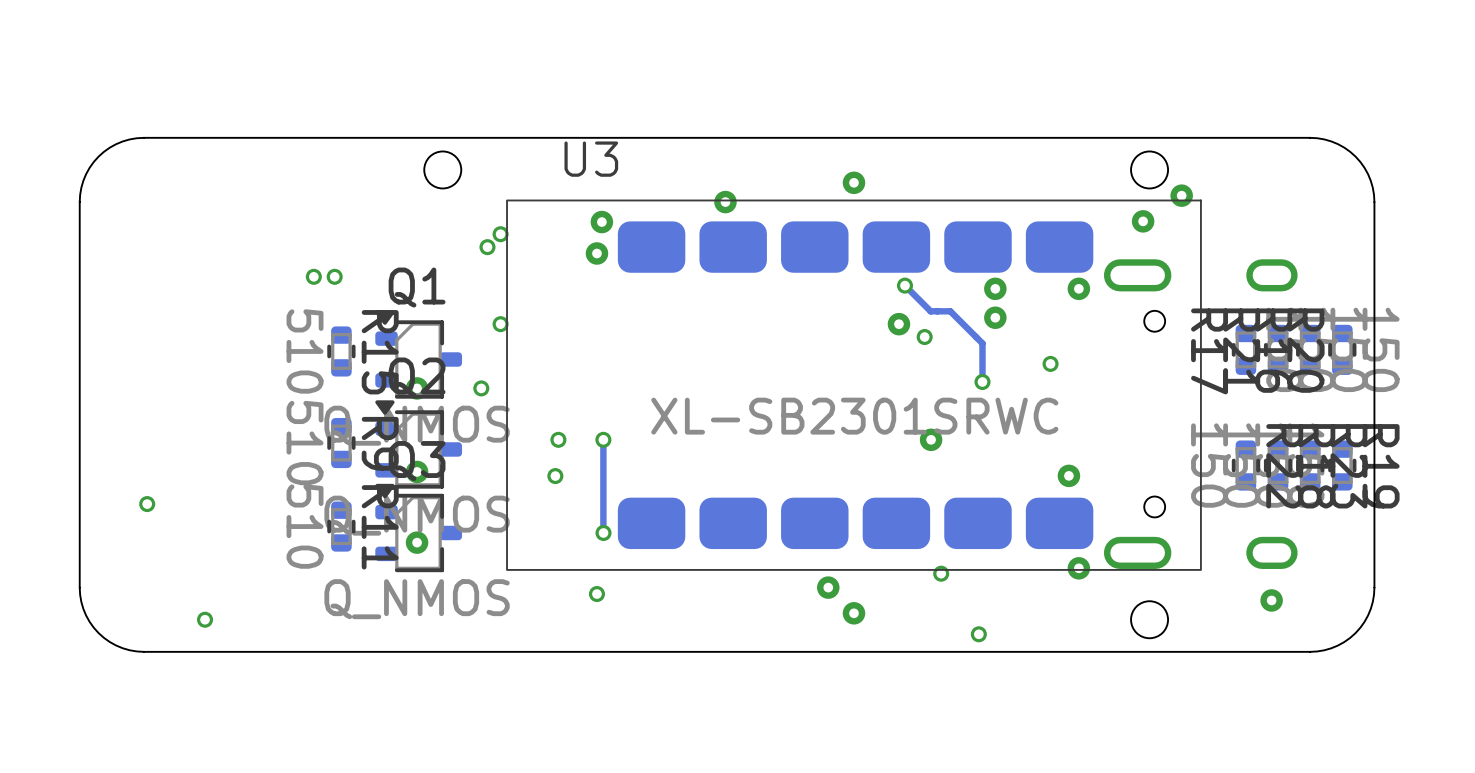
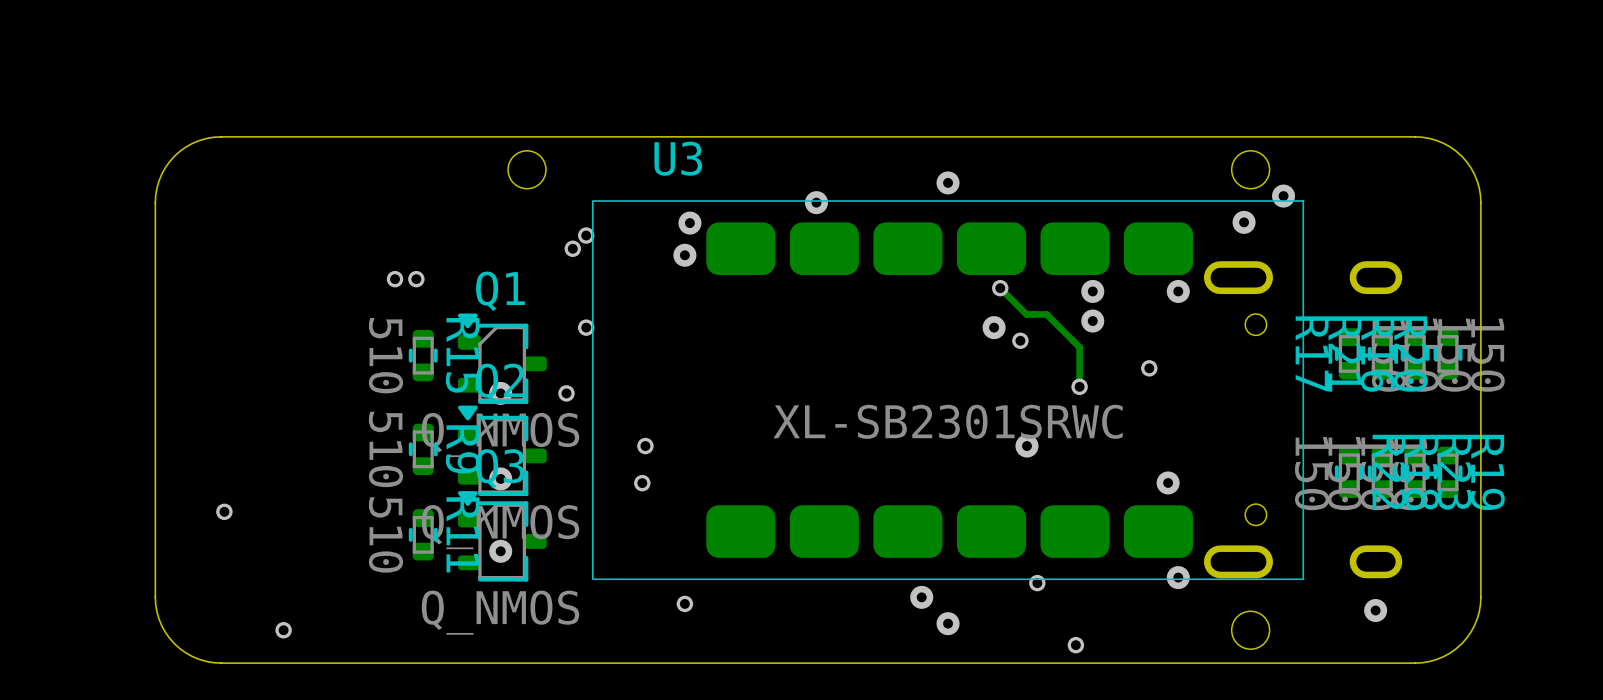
via: (603, 439) -> none
via: (603, 532) -> none

